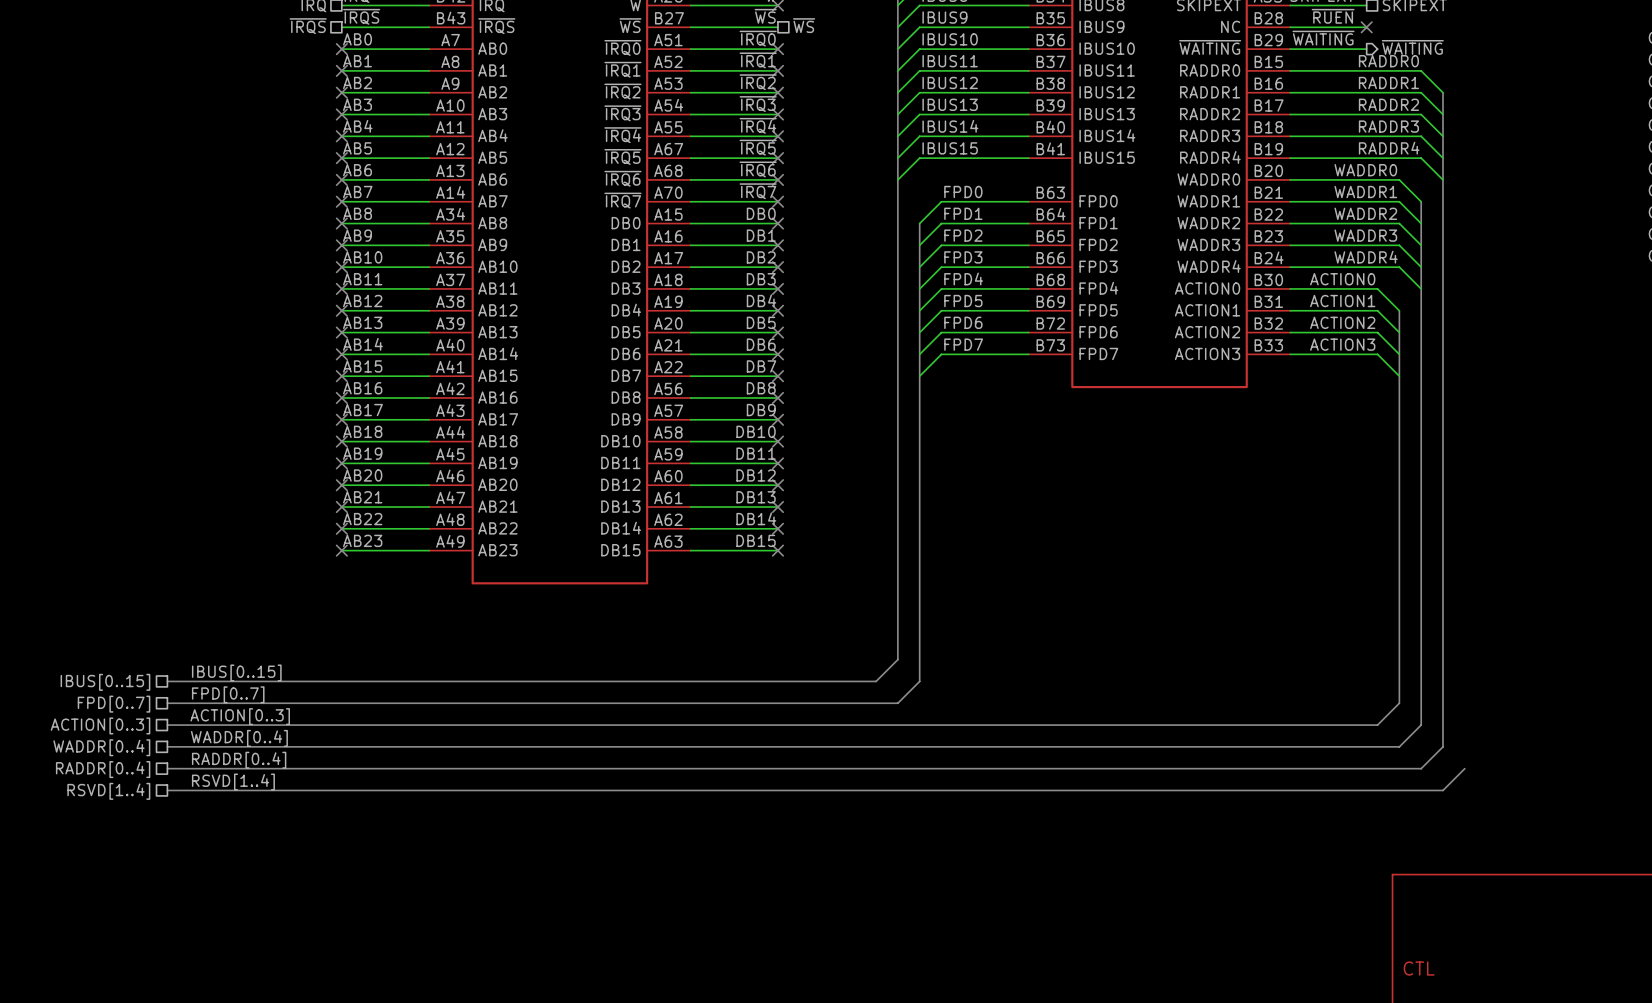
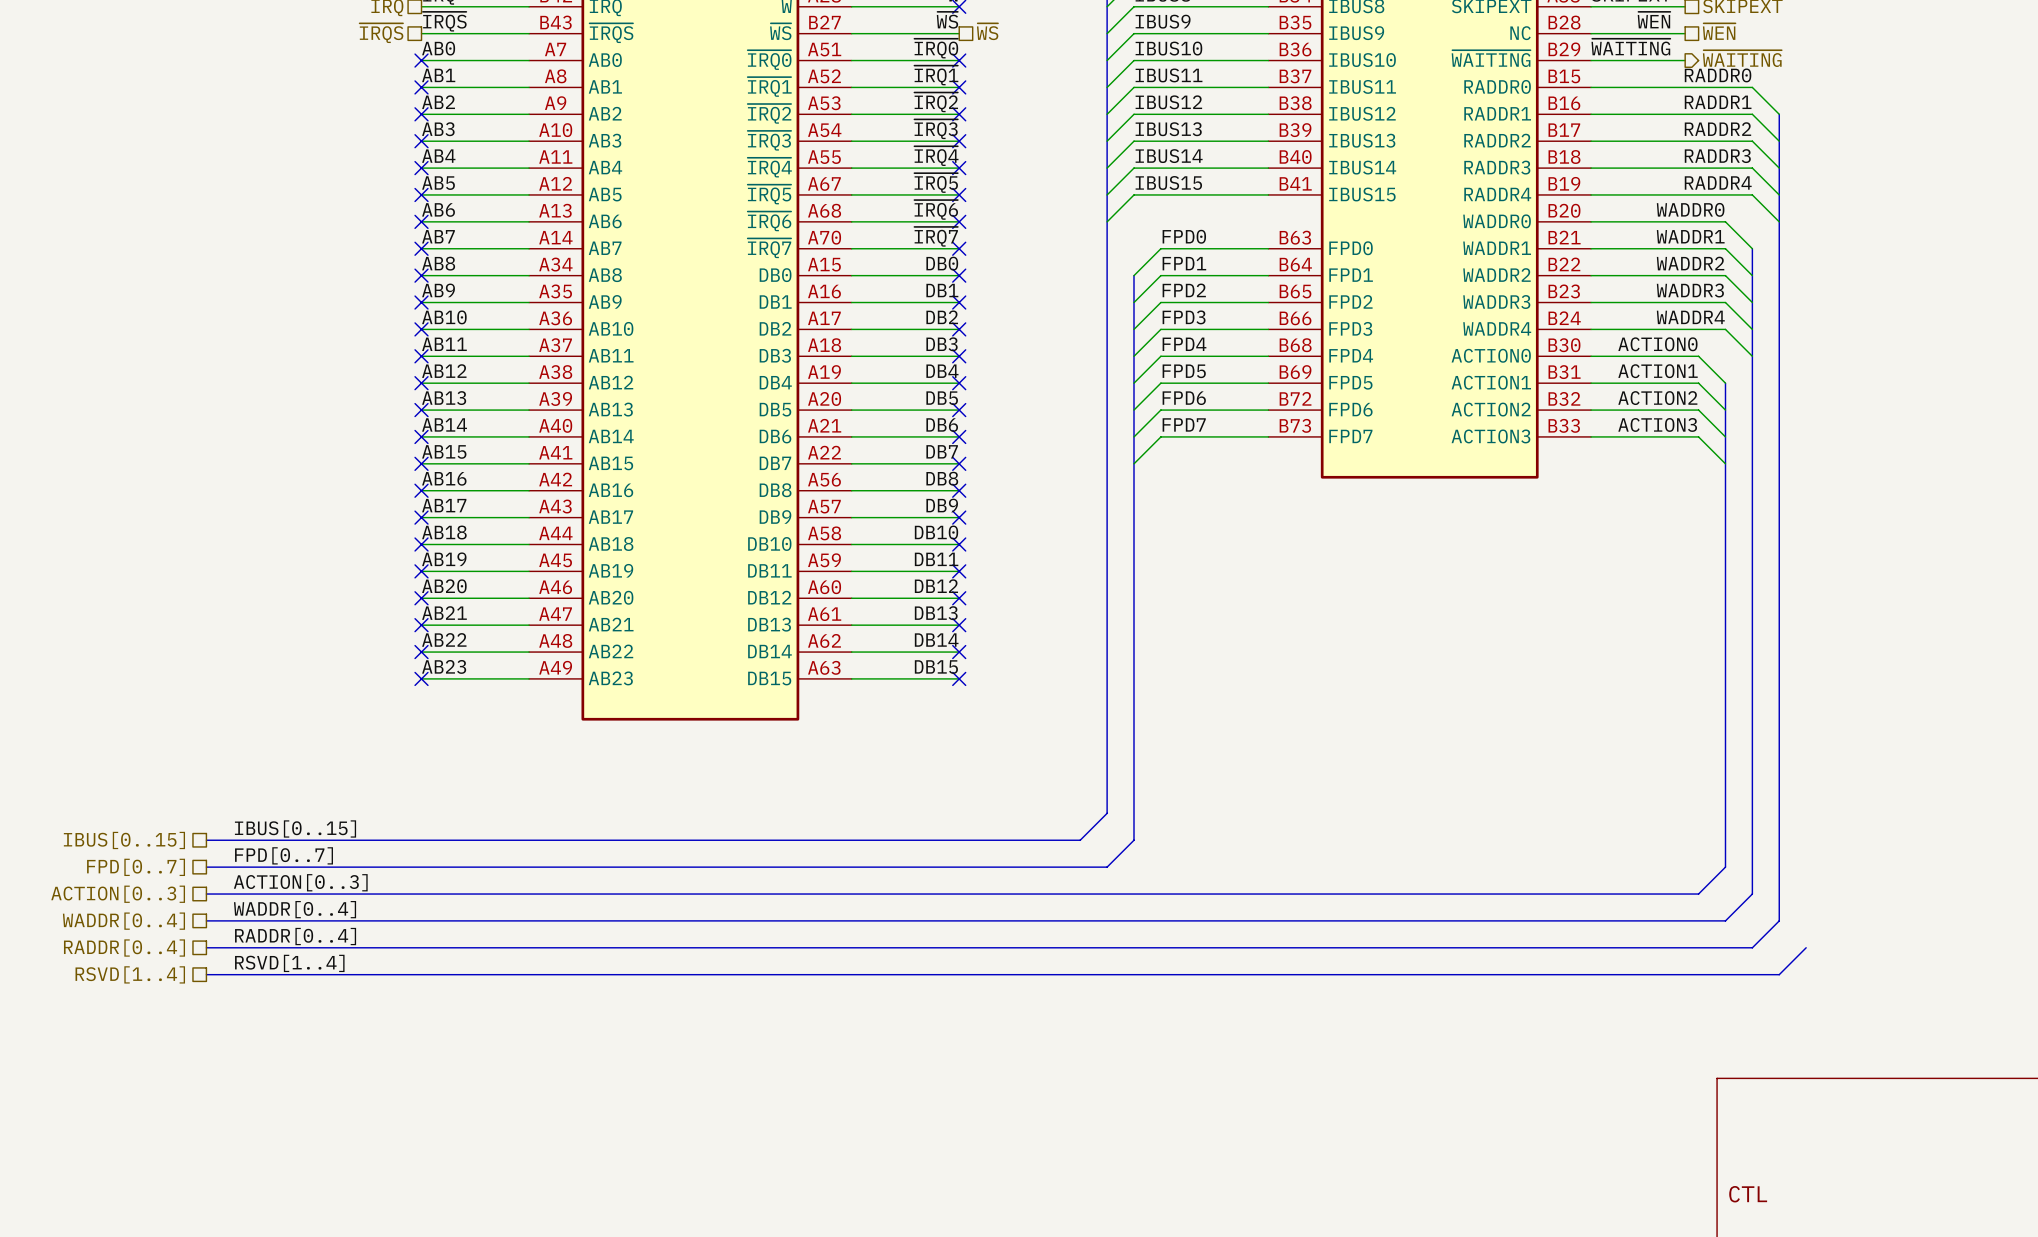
label: ~{RUEN} (1333, 16) -> ~{WEN} (1654, 20)
hierarchical label: none -> ~{WEN} (1719, 31)
no-connect mark: (1366, 27) -> none

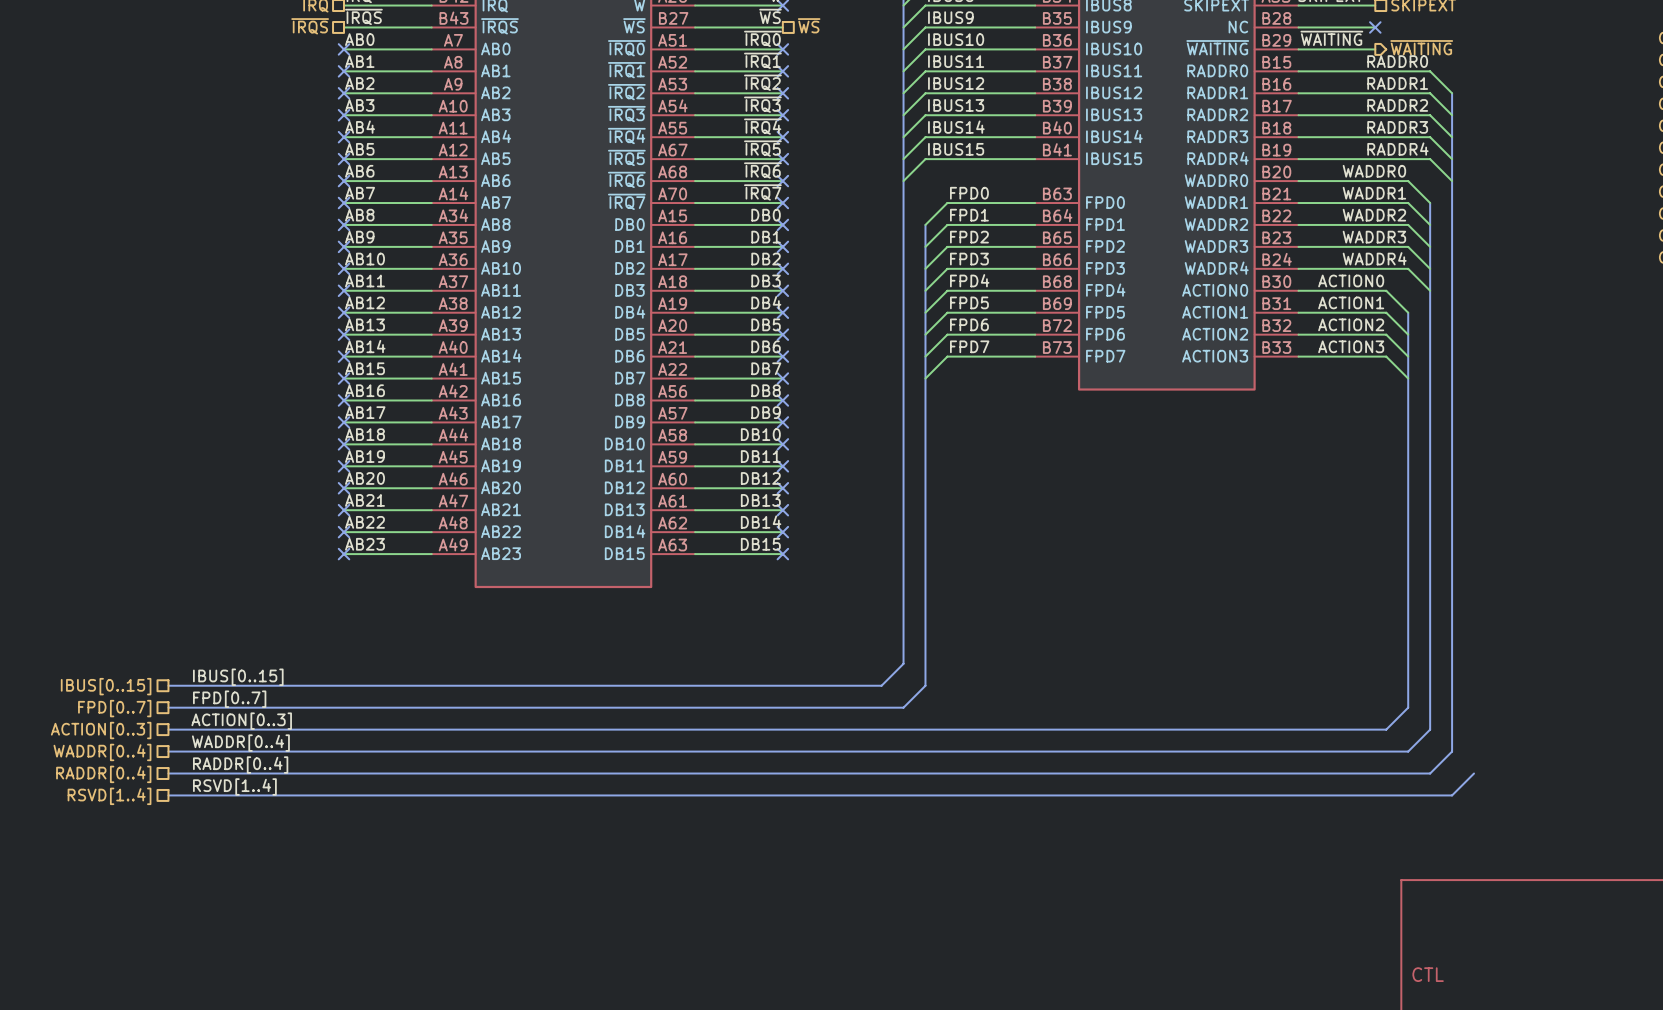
label: ~{WEN} (1654, 20) -> none
hierarchical label: ~{WEN} (1719, 31) -> none
no-connect mark: none -> (1375, 27)

